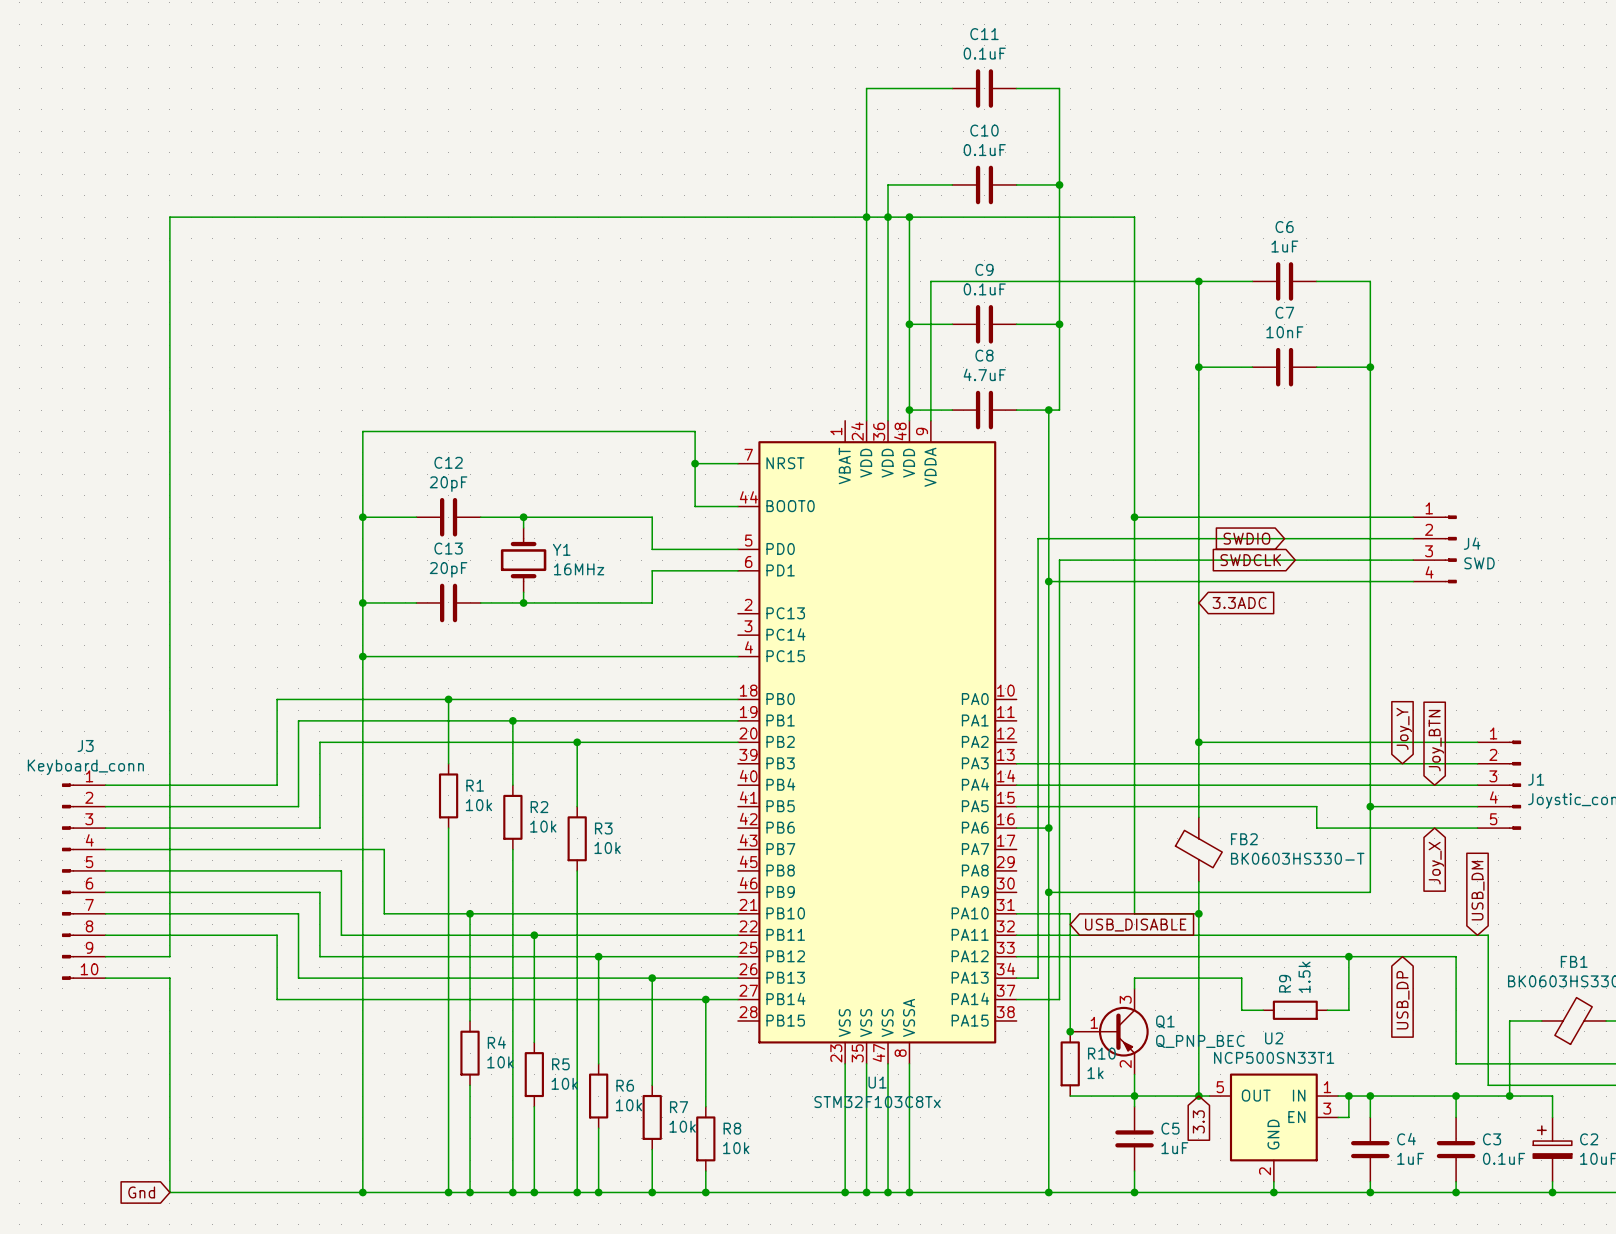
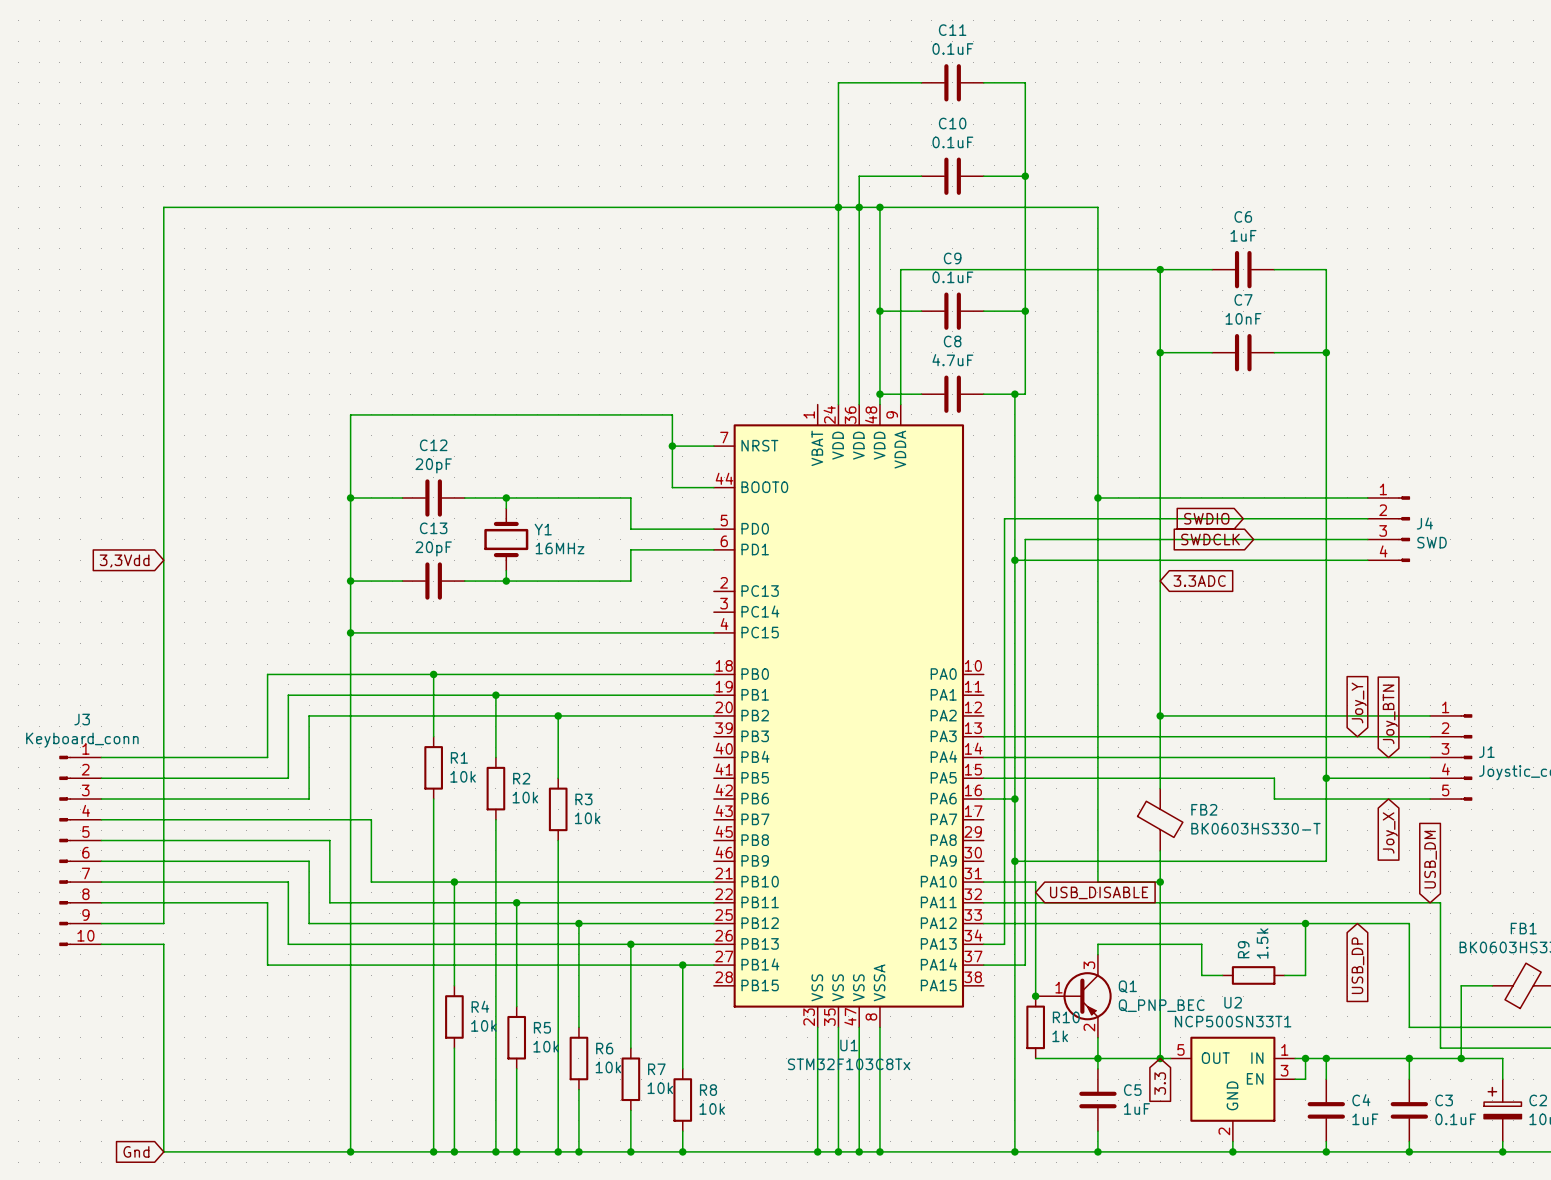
global label: none -> 3,3Vdd (124, 561)

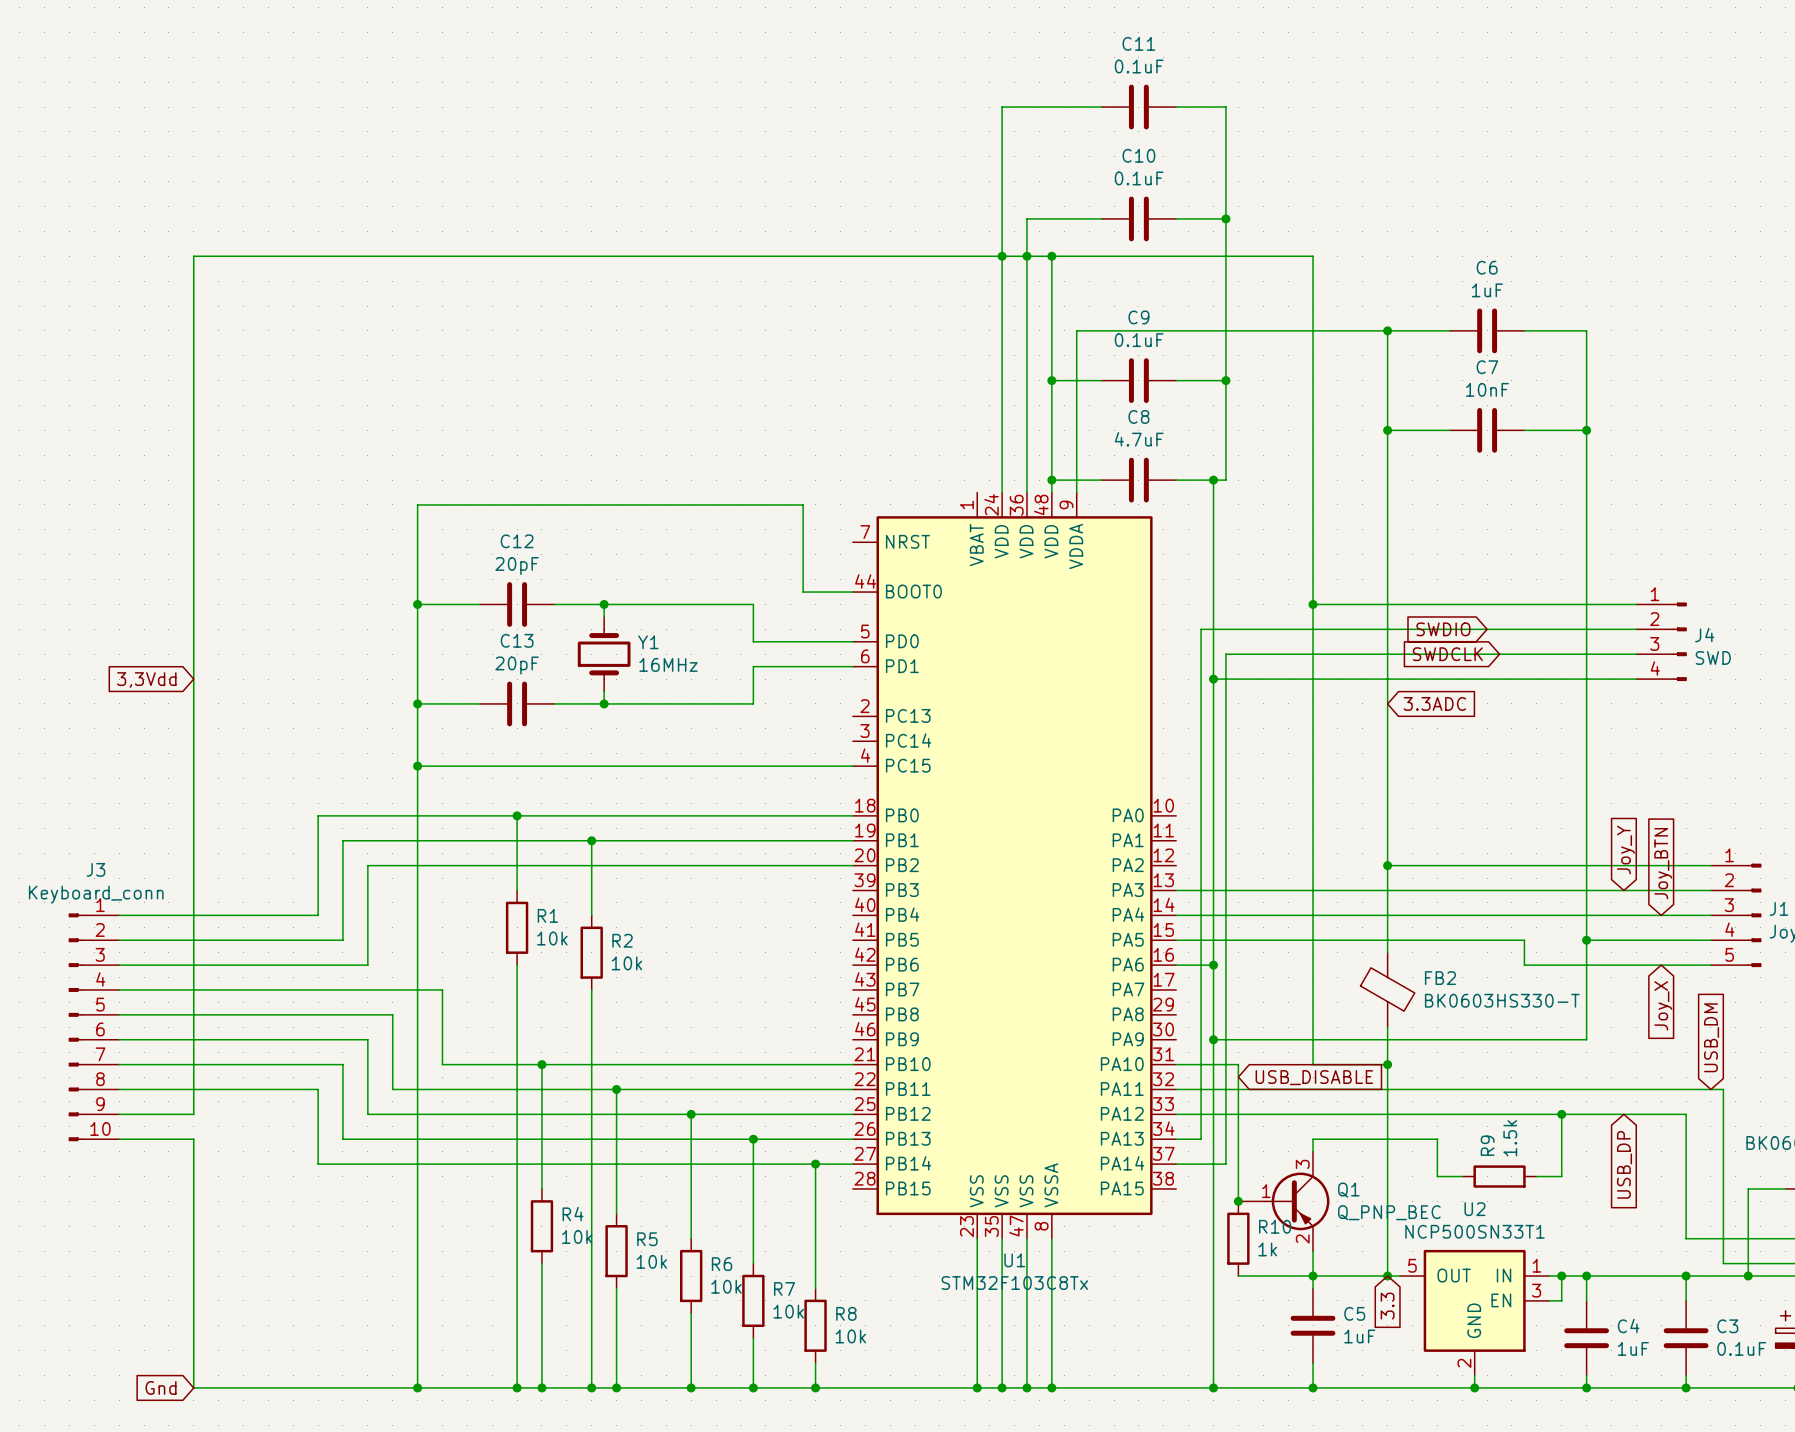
wire: (672, 446) (713, 446) -> none
junction: (672, 446) -> none
wire: (558, 715) (558, 778) -> none
junction: (558, 715) -> none
R3: 10k (558, 809) -> none
wire: (558, 840) (558, 1151) -> none
junction: (558, 1151) -> none

